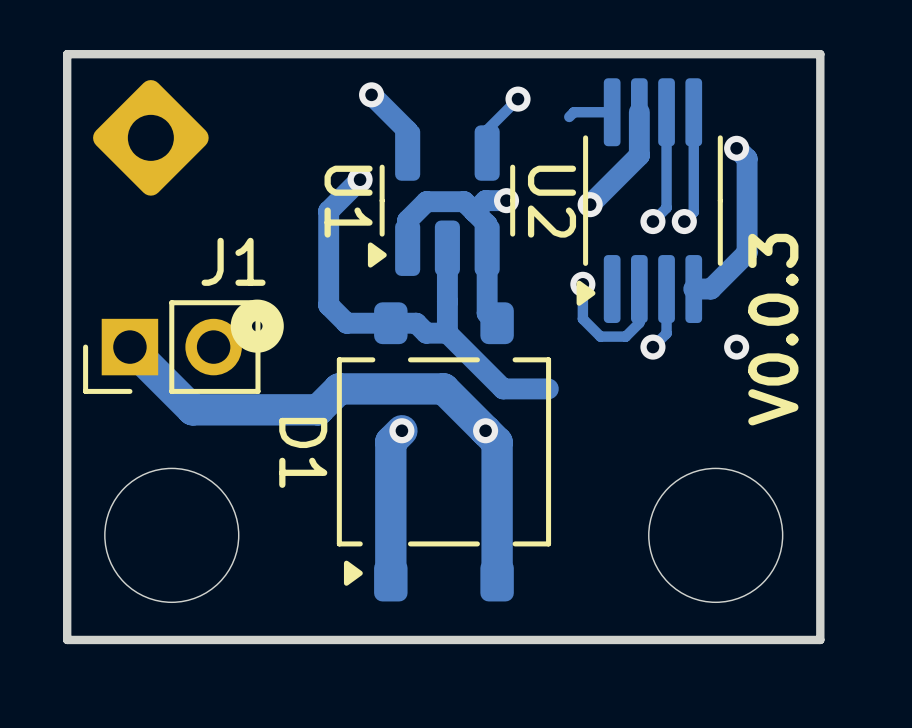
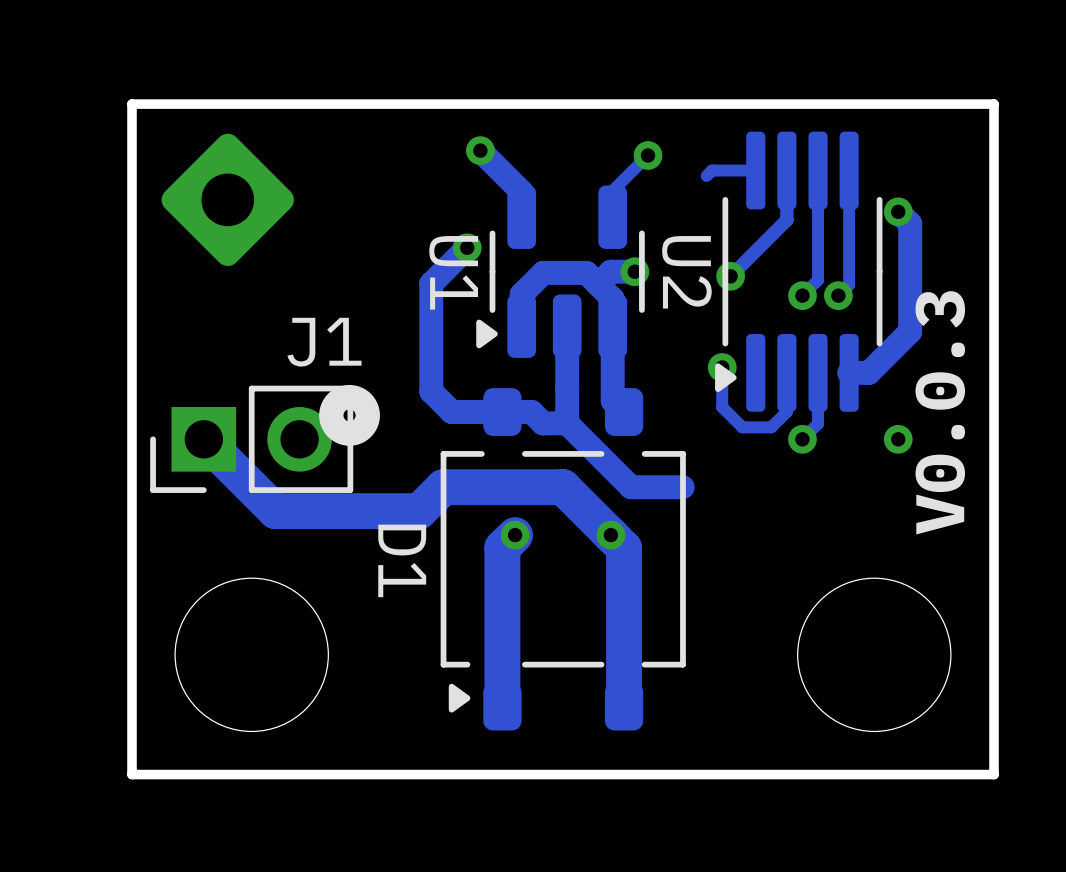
track width: thick (639, 112) (639, 155) (590, 204) -> thin (786, 170) (786, 220) (730, 276)

